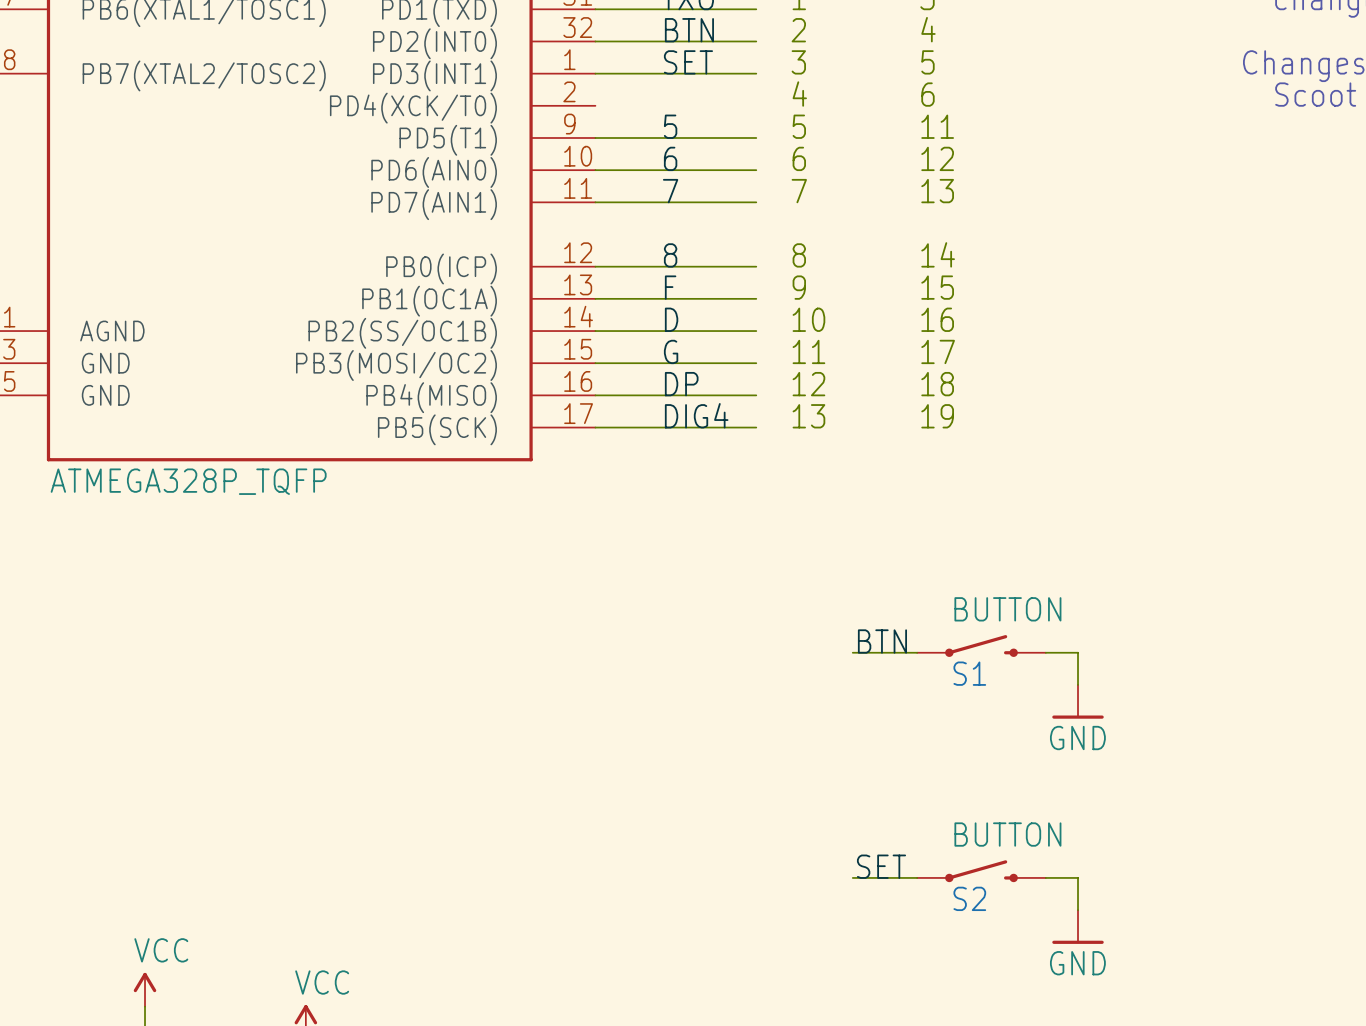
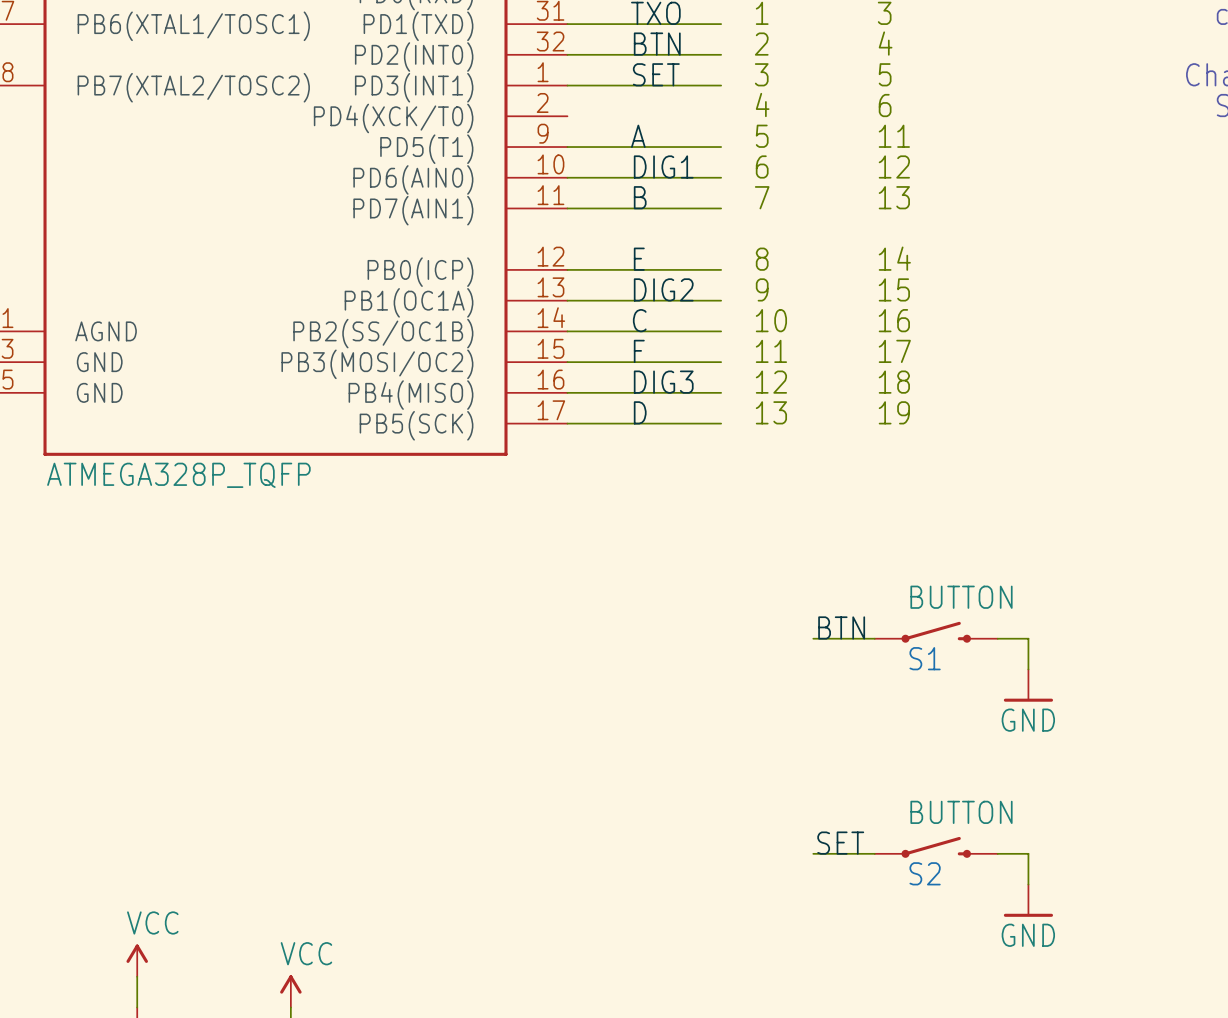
label: 5 (670, 126) -> A (638, 136)
label: 6 (670, 158) -> DIG1 (663, 166)
label: 7 (670, 191) -> B (640, 197)
label: 8 (670, 255) -> E (639, 259)
label: F (670, 287) -> DIG2 (663, 289)
label: D (671, 319) -> C (639, 320)
label: G (671, 351) -> F (639, 351)
label: DP (681, 384) -> DIG3 (663, 382)
label: DIG4 (696, 415) -> D (640, 412)

